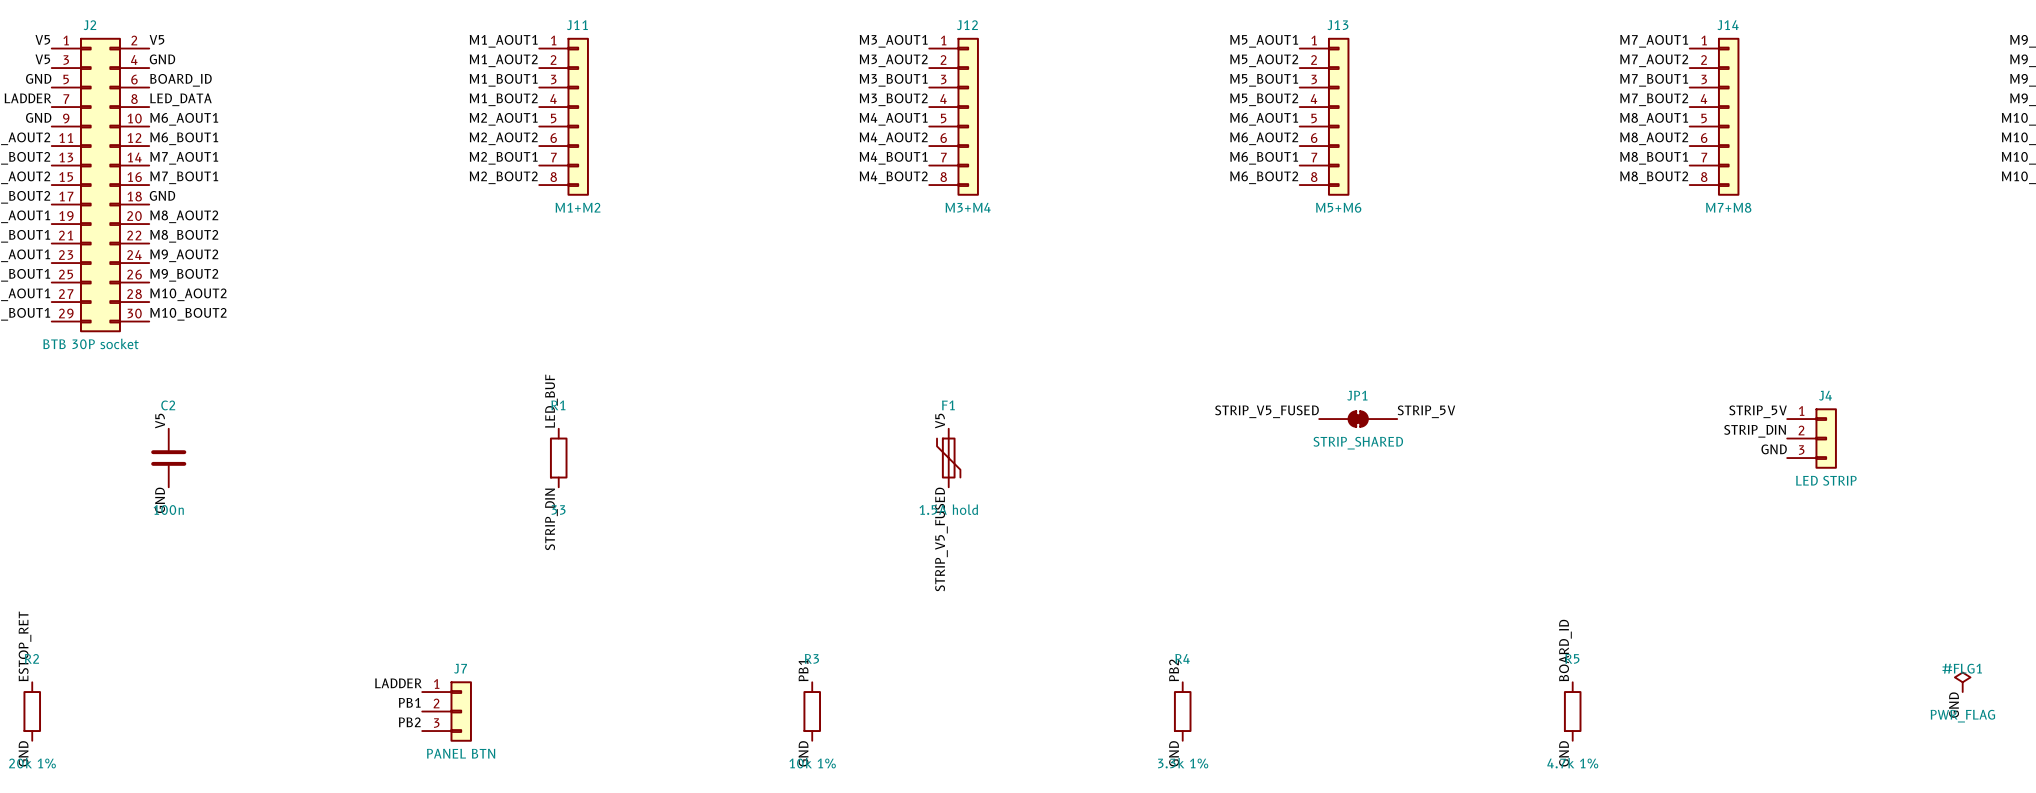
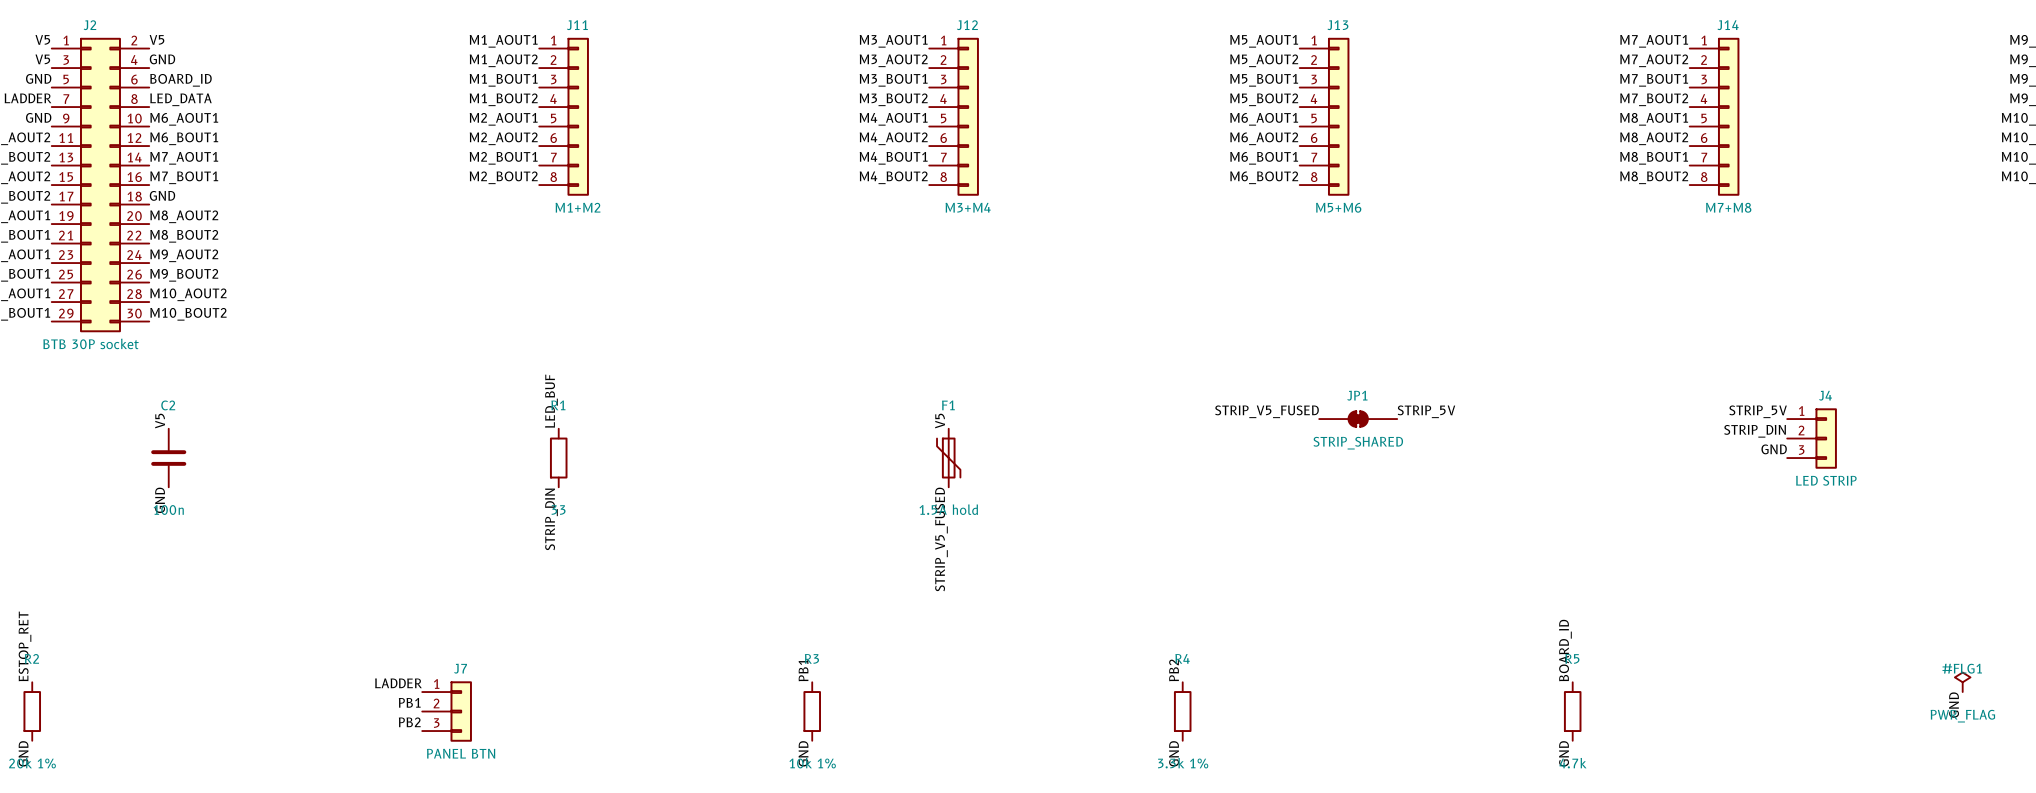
R5 value: 4.7k 1% (1572, 763) -> 4.7k (1573, 763)

